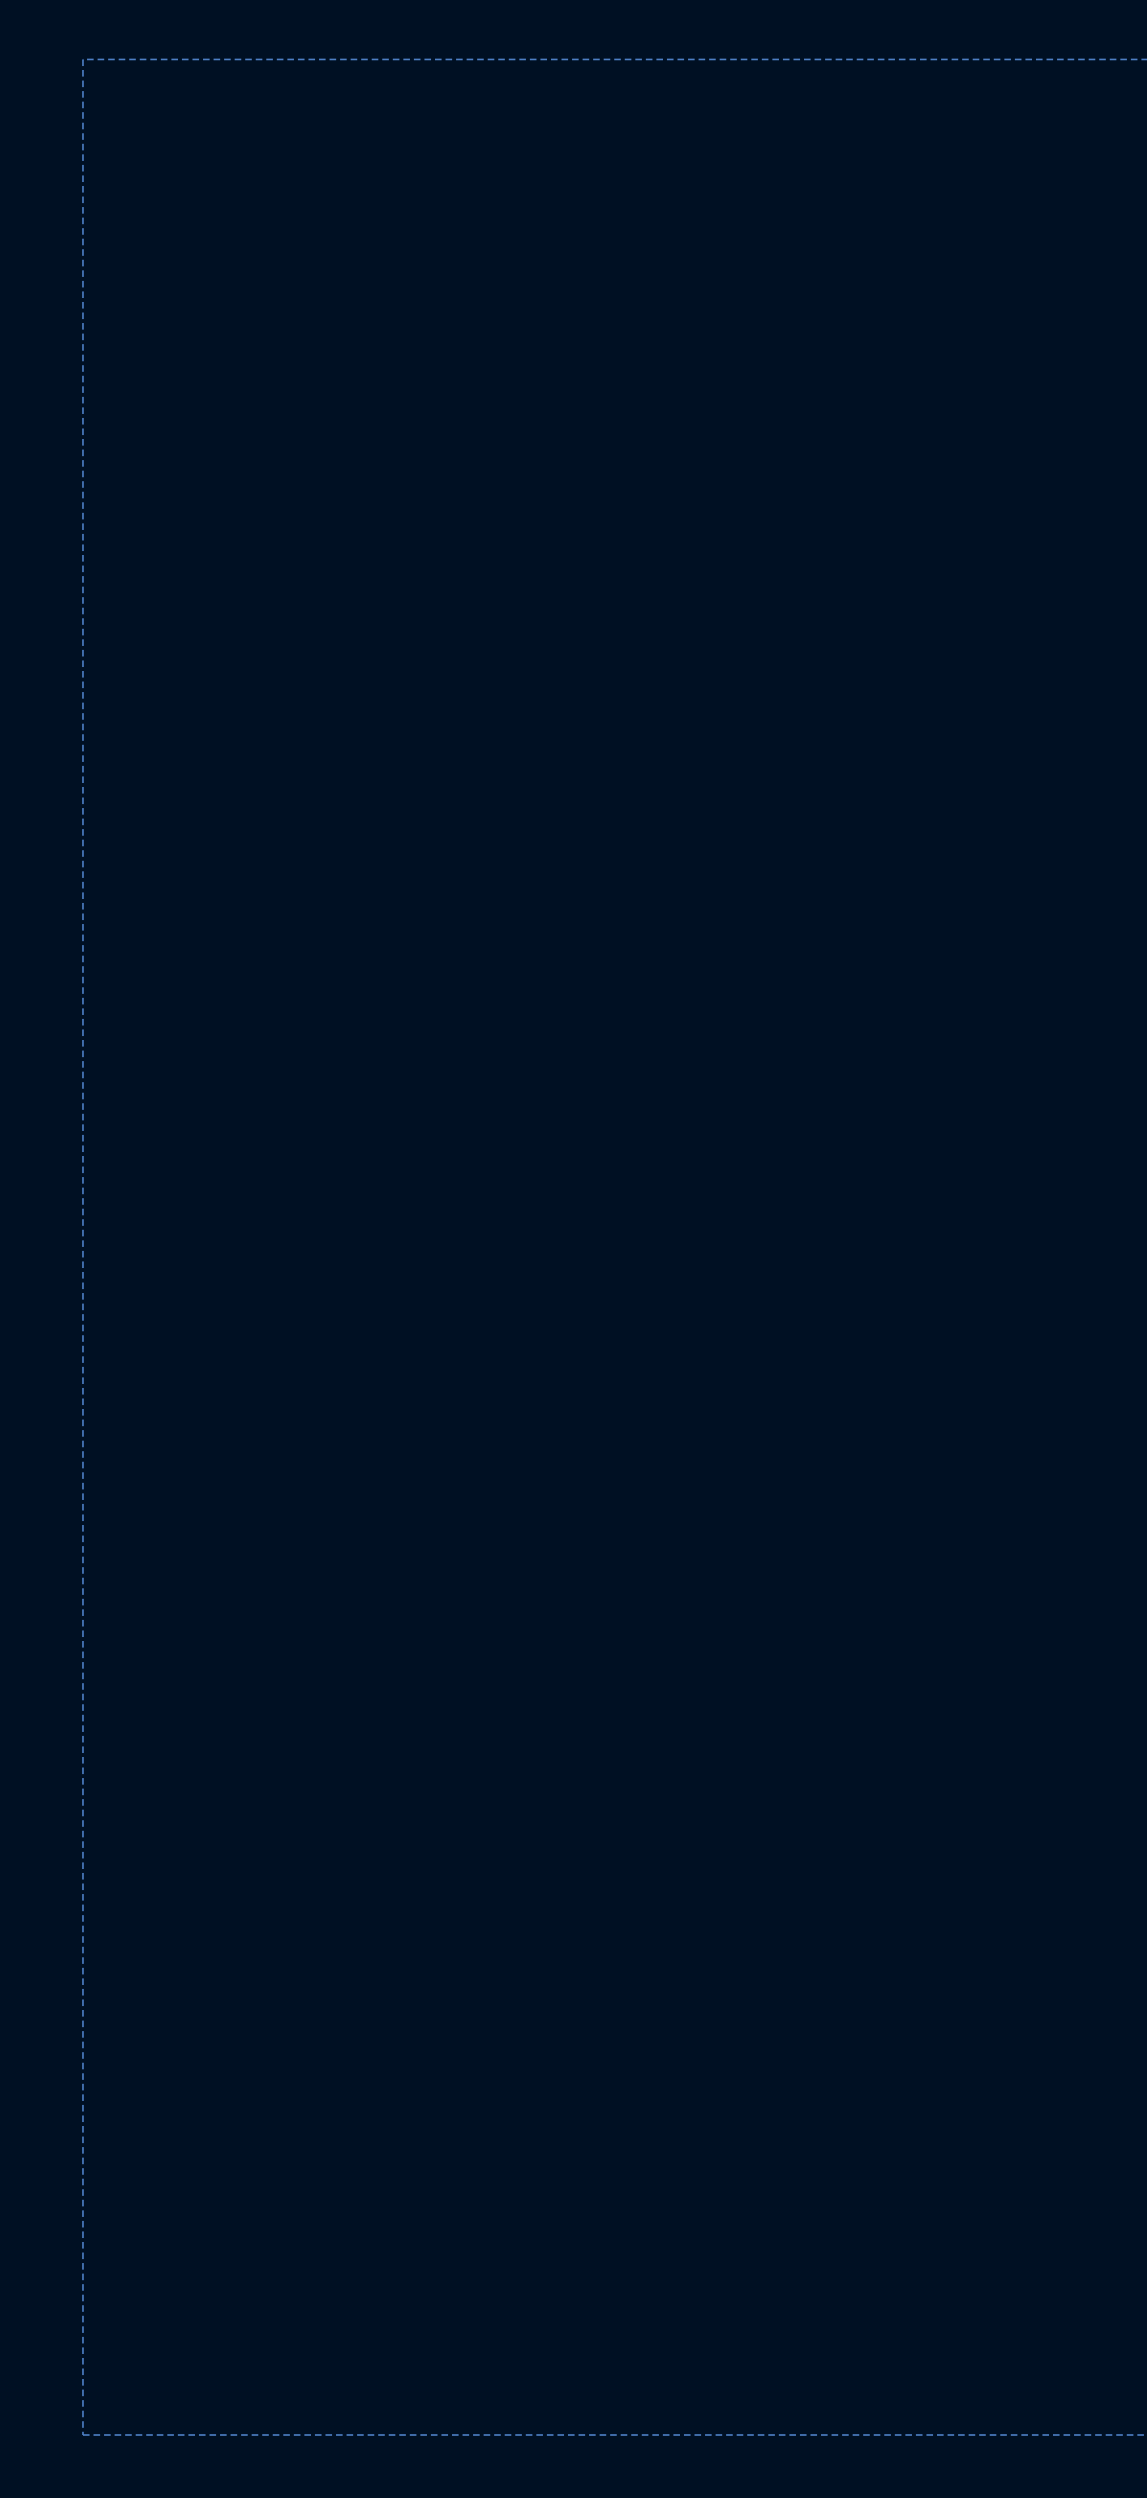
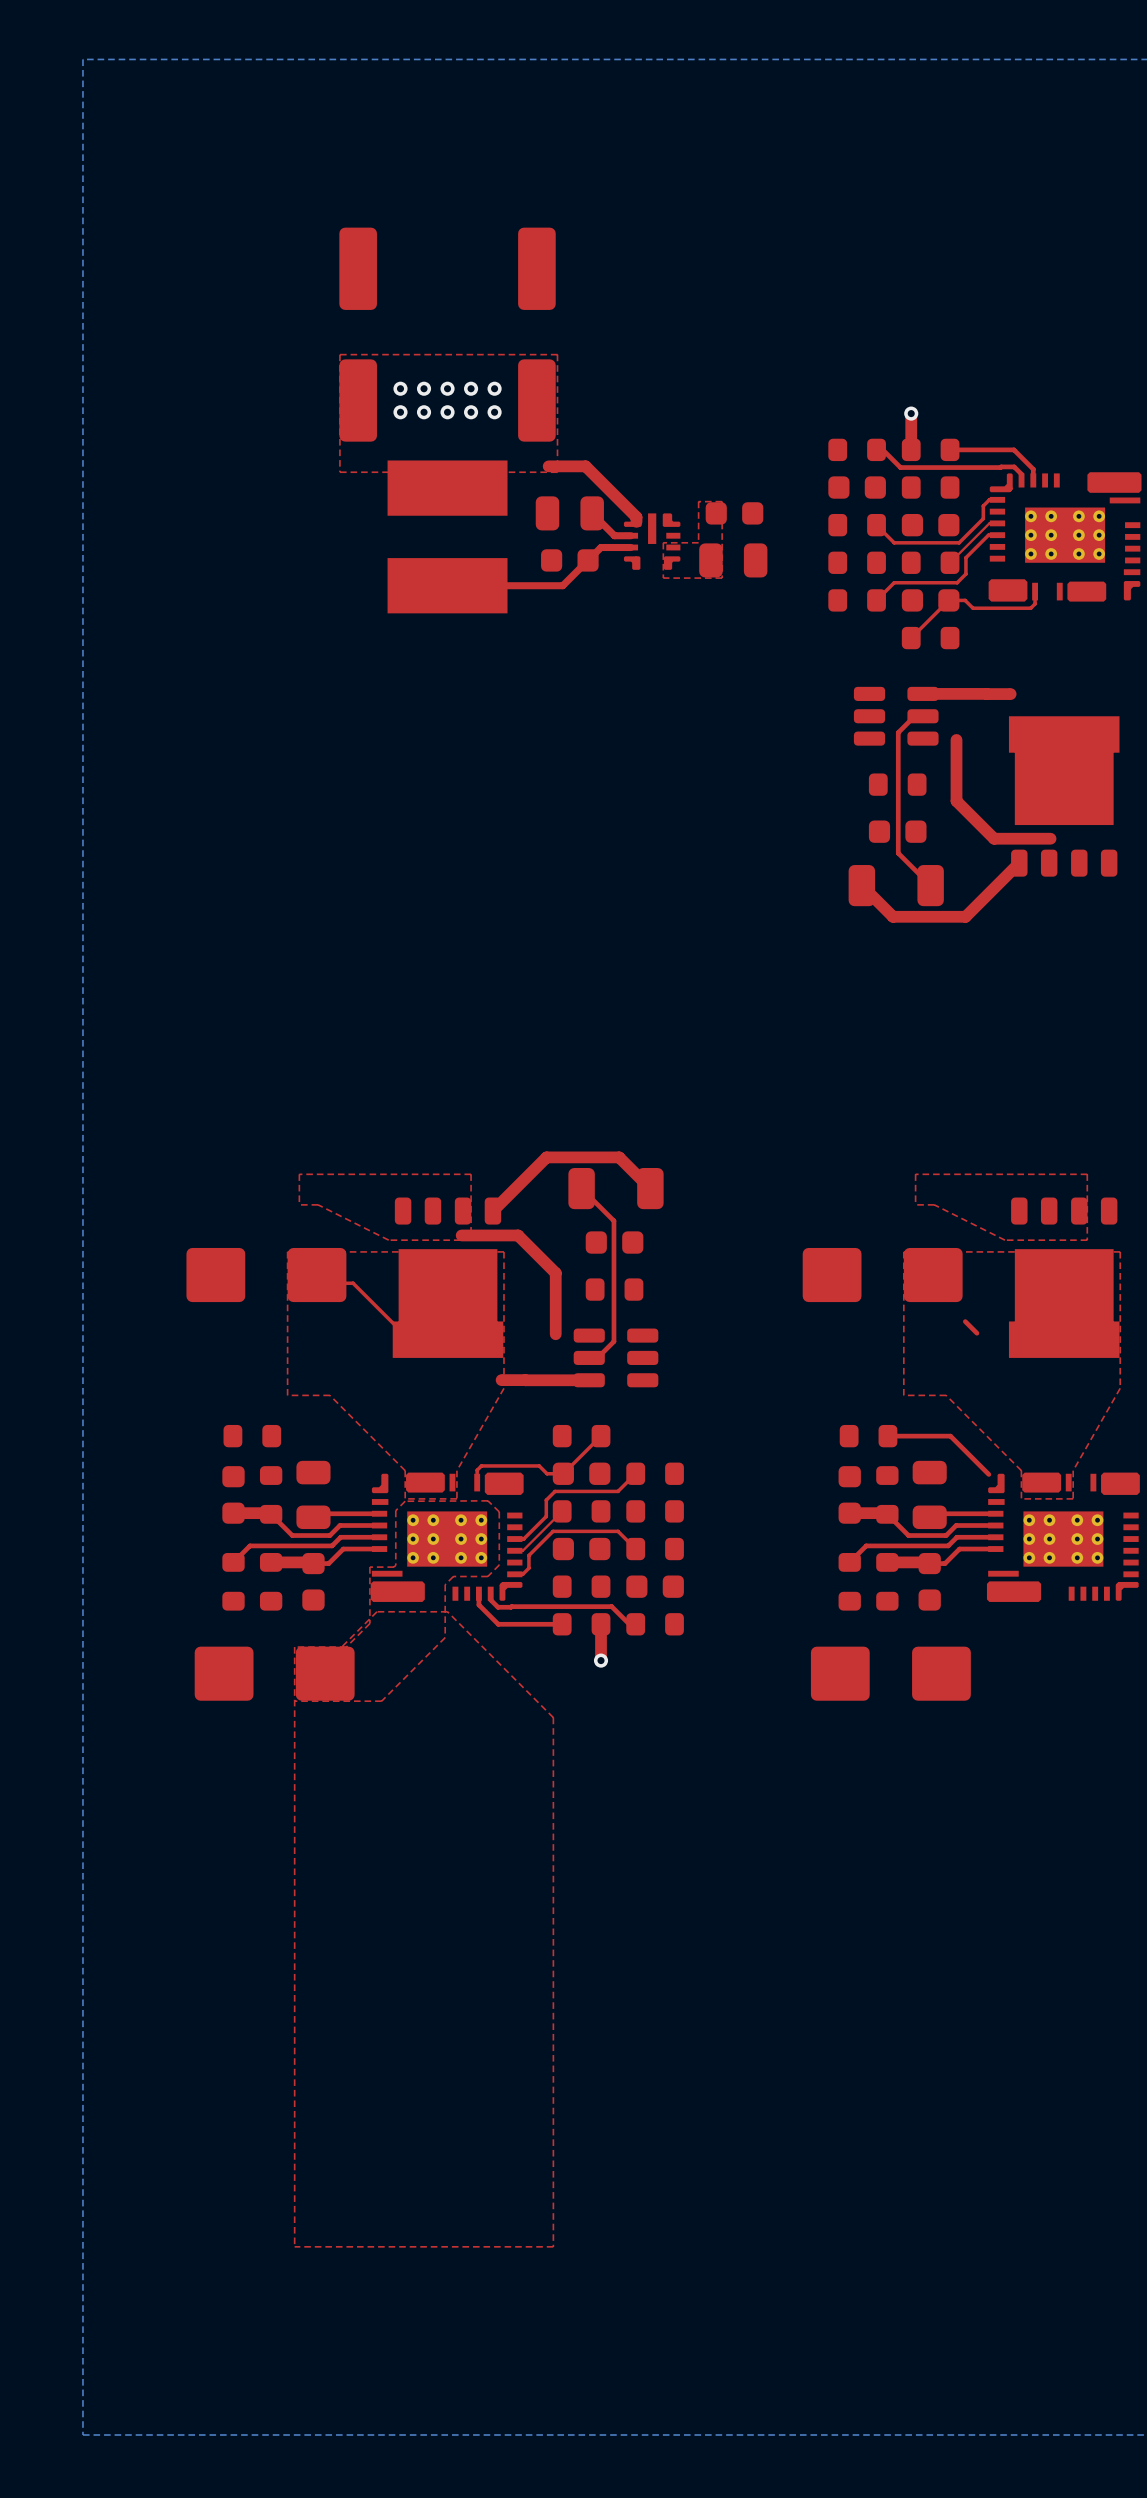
part: none -> (358, 334)
part: none -> (536, 334)
top zone outline: none -> (557, 354) (557, 472) (339, 472) (339, 354) (557, 354)
via: none -> (400, 388)
via: none -> (424, 388)
via: none -> (447, 388)
via: none -> (471, 388)
via: none -> (494, 388)
via: none -> (400, 412)
via: none -> (424, 412)
via: none -> (447, 412)
via: none -> (471, 412)
via: none -> (494, 412)
top track: none -> (911, 413) (911, 449)
via: none -> (911, 413)
part: none -> (857, 449)
top track: none -> (876, 449) (882, 449) (900, 467) (1014, 466) (1021, 474) (1021, 480)
part: none -> (930, 449)
top track: none -> (950, 449) (1013, 449) (1033, 469) (1033, 480)
top track: none -> (548, 466) (585, 466) (636, 517) (636, 521)
part: none -> (857, 487)
part: none -> (930, 487)
top track: none -> (997, 499) (989, 499) (983, 505) (983, 518) (959, 542) (894, 542) (876, 525)
top zone outline: none -> (722, 501) (698, 501) (698, 542) (663, 542) (663, 578) (722, 578) (722, 501)
part: none -> (569, 513)
top track: none -> (592, 513) (614, 535) (630, 535)
part: none -> (734, 513)
top track: none -> (997, 523) (989, 523) (950, 562)
part: none -> (857, 525)
part: none -> (930, 525)
top track: none -> (997, 535) (988, 535) (965, 557) (965, 574) (957, 582) (894, 582) (876, 600)
part: none -> (447, 536)
part: none -> (1065, 536)
part: none -> (652, 541)
top track: none -> (630, 547) (601, 547) (562, 585) (447, 585)
part: none -> (569, 560)
part: none -> (733, 560)
part: none -> (857, 562)
part: none -> (930, 562)
top track: none -> (1035, 591) (1035, 603) (1030, 608) (972, 608) (965, 600) (948, 600) (911, 638)
part: none -> (857, 600)
part: none -> (930, 600)
part: none -> (930, 638)
top track: none -> (986, 693) (922, 693)
part: none -> (998, 694)
part: none -> (896, 716)
top track: none -> (922, 716) (914, 716) (898, 732) (898, 853) (930, 885)
top track: none -> (956, 739) (956, 801) (994, 838) (1050, 838)
part: none -> (897, 784)
part: none -> (1064, 796)
part: none -> (897, 831)
top track: none -> (1019, 863) (965, 916) (893, 916) (861, 885)
part: none -> (896, 885)
top zone outline: none -> (471, 1174) (299, 1174) (299, 1204) (318, 1204) (388, 1240) (471, 1240) (471, 1174)
top zone outline: none -> (1087, 1174) (915, 1174) (915, 1204) (934, 1204) (1004, 1240) (1087, 1240) (1087, 1174)
top track: none -> (581, 1188) (613, 1220) (613, 1341) (597, 1357) (589, 1357)
part: none -> (616, 1188)
top track: none -> (650, 1188) (619, 1157) (546, 1157) (492, 1211)
top track: none -> (461, 1235) (518, 1235) (555, 1273) (555, 1334)
part: none -> (614, 1242)
top zone outline: none -> (503, 1251) (503, 1388) (456, 1470) (456, 1498) (405, 1498) (405, 1470) (329, 1395) (287, 1395) (287, 1251) (503, 1251)
top zone outline: none -> (1120, 1251) (903, 1251) (903, 1395) (946, 1395) (1021, 1470) (1021, 1498) (1073, 1498) (1073, 1470) (1120, 1388) (1120, 1251)
part: none -> (266, 1275)
part: none -> (882, 1275)
part: none -> (448, 1277)
part: none -> (1064, 1277)
top track: none -> (290, 1283) (353, 1283) (403, 1333)
part: none -> (614, 1289)
top track: none -> (965, 1321) (976, 1333)
part: none -> (616, 1357)
part: none -> (513, 1380)
top track: none -> (589, 1380) (525, 1380)
part: none -> (252, 1436)
part: none -> (581, 1436)
top track: none -> (601, 1436) (563, 1473) (547, 1473) (539, 1465) (481, 1465) (477, 1470) (477, 1482)
part: none -> (868, 1436)
top track: none -> (887, 1436) (950, 1436) (988, 1474)
part: none -> (581, 1473)
top track: none -> (635, 1473) (618, 1491) (555, 1491) (546, 1500) (546, 1516) (523, 1539) (514, 1539)
part: none -> (655, 1473)
part: none -> (233, 1494)
part: none -> (271, 1494)
part: none -> (313, 1494)
part: none -> (849, 1494)
part: none -> (887, 1494)
part: none -> (929, 1494)
top track: none -> (562, 1511) (522, 1550) (514, 1550)
part: none -> (581, 1511)
part: none -> (655, 1511)
top track: none -> (233, 1513) (269, 1513) (292, 1535) (329, 1535) (339, 1525) (379, 1525)
top track: none -> (379, 1513) (317, 1513) (313, 1517)
top track: none -> (849, 1513) (886, 1513) (908, 1535) (946, 1535) (956, 1525) (995, 1525)
top track: none -> (995, 1513) (933, 1513) (929, 1517)
top track: none -> (379, 1537) (340, 1537) (332, 1545) (249, 1545) (233, 1562)
part: none -> (447, 1537)
top track: none -> (995, 1537) (956, 1537) (948, 1545) (866, 1545) (849, 1562)
part: none -> (1063, 1537)
top track: none -> (379, 1549) (343, 1549) (328, 1563) (271, 1562)
part: none -> (581, 1549)
top track: none -> (635, 1549) (618, 1531) (553, 1531) (528, 1555) (528, 1568) (522, 1574) (514, 1574)
part: none -> (655, 1549)
top track: none -> (995, 1549) (959, 1549) (944, 1563) (887, 1562)
part: none -> (233, 1581)
part: none -> (271, 1581)
part: none -> (313, 1581)
part: none -> (849, 1581)
part: none -> (887, 1581)
part: none -> (929, 1581)
part: none -> (581, 1586)
part: none -> (655, 1586)
top track: none -> (478, 1593) (478, 1604) (498, 1624) (562, 1624)
top track: none -> (490, 1593) (490, 1599) (498, 1607) (611, 1606) (629, 1624) (635, 1624)
part: none -> (581, 1624)
top track: none -> (601, 1624) (601, 1660)
part: none -> (655, 1624)
top zone outline: none -> (341, 1647) (376, 1611) (447, 1611) (553, 1717) (553, 2246) (294, 2246) (294, 1647) (346, 1647) (369, 1623) (369, 1567) (394, 1567) (395, 1565) (395, 1510) (405, 1501) (487, 1500) (499, 1511) (499, 1565) (487, 1576) (453, 1576) (445, 1584) (445, 1637) (381, 1701) (294, 1701)
via: none -> (601, 1660)
part: none -> (274, 1673)
part: none -> (890, 1673)

